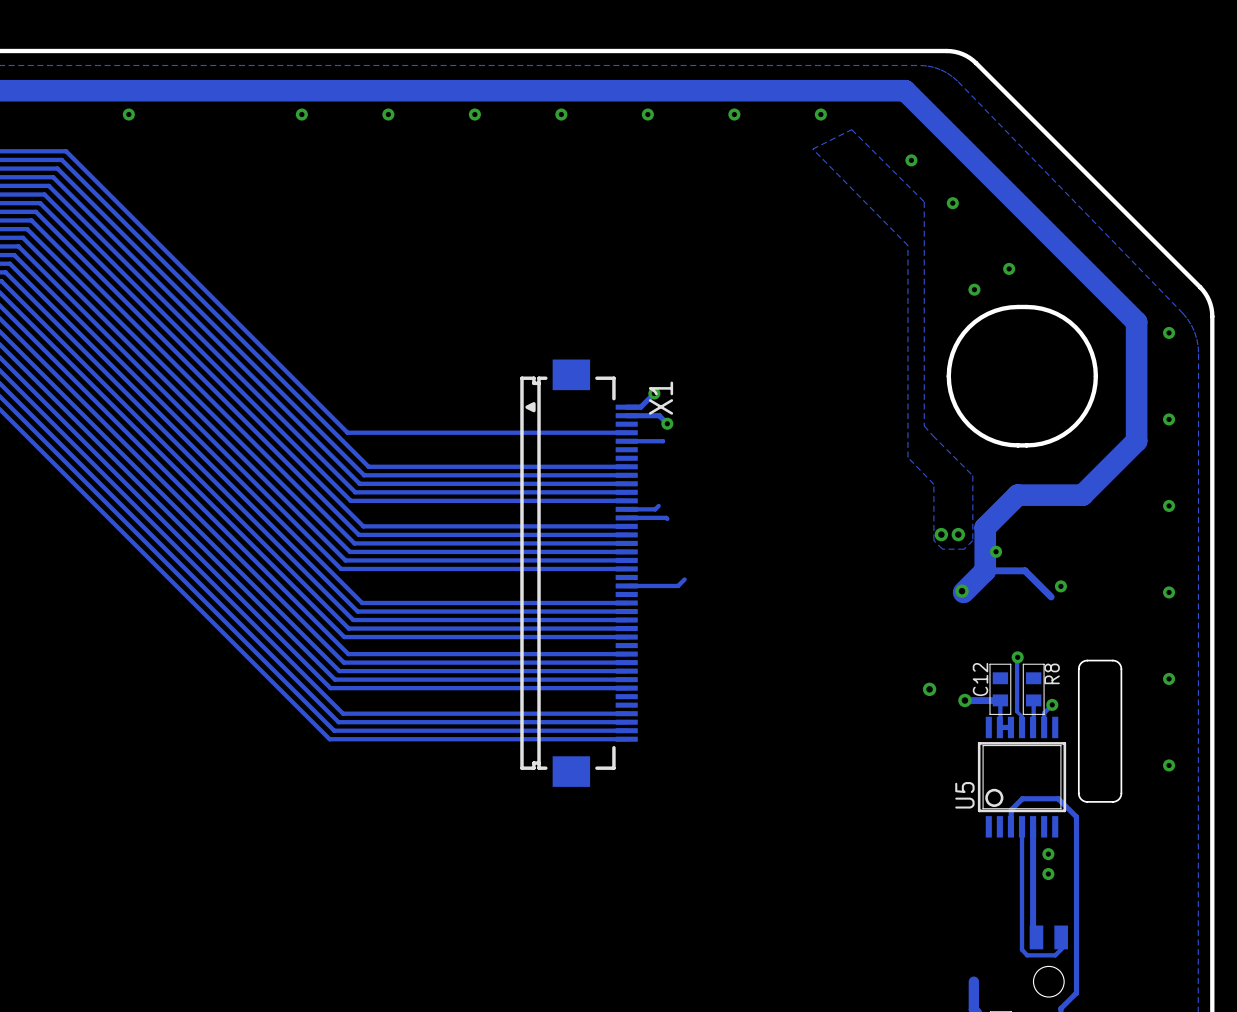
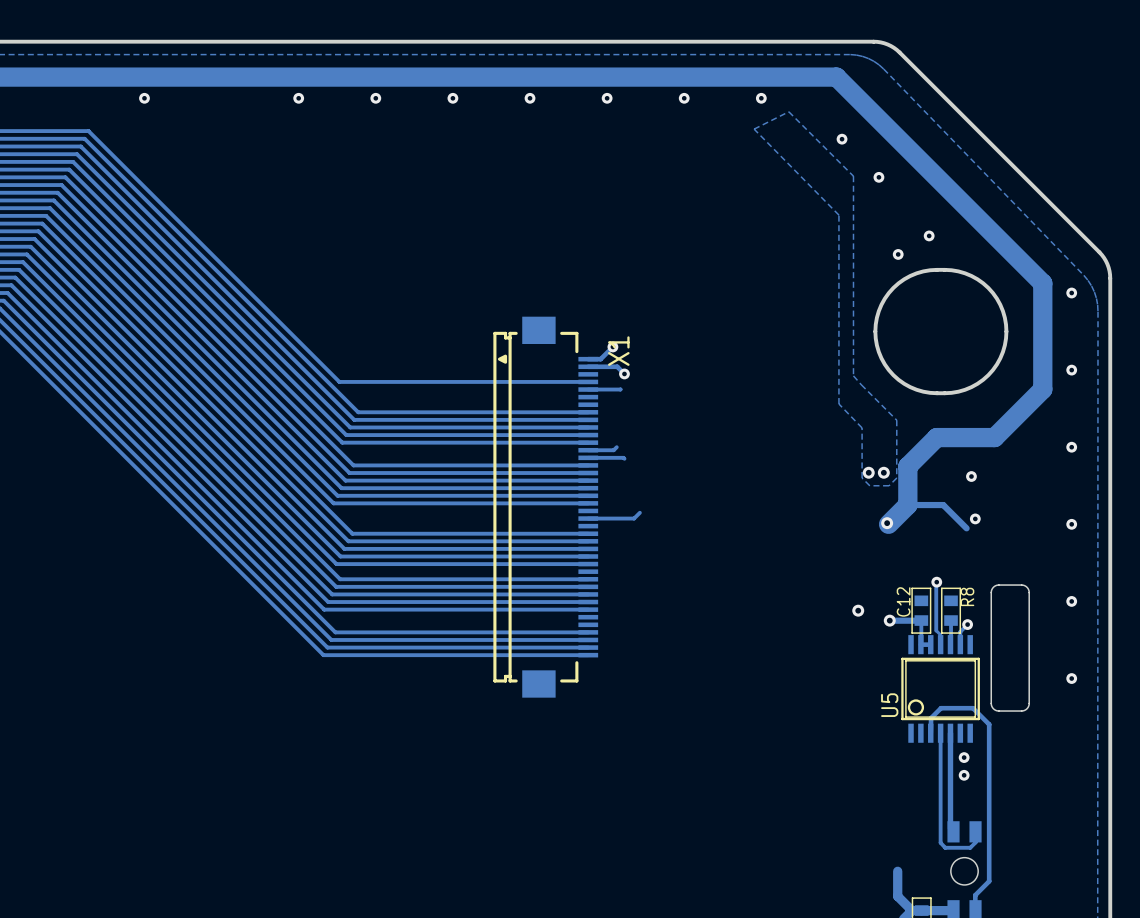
via position: (996, 551) -> (971, 476)

